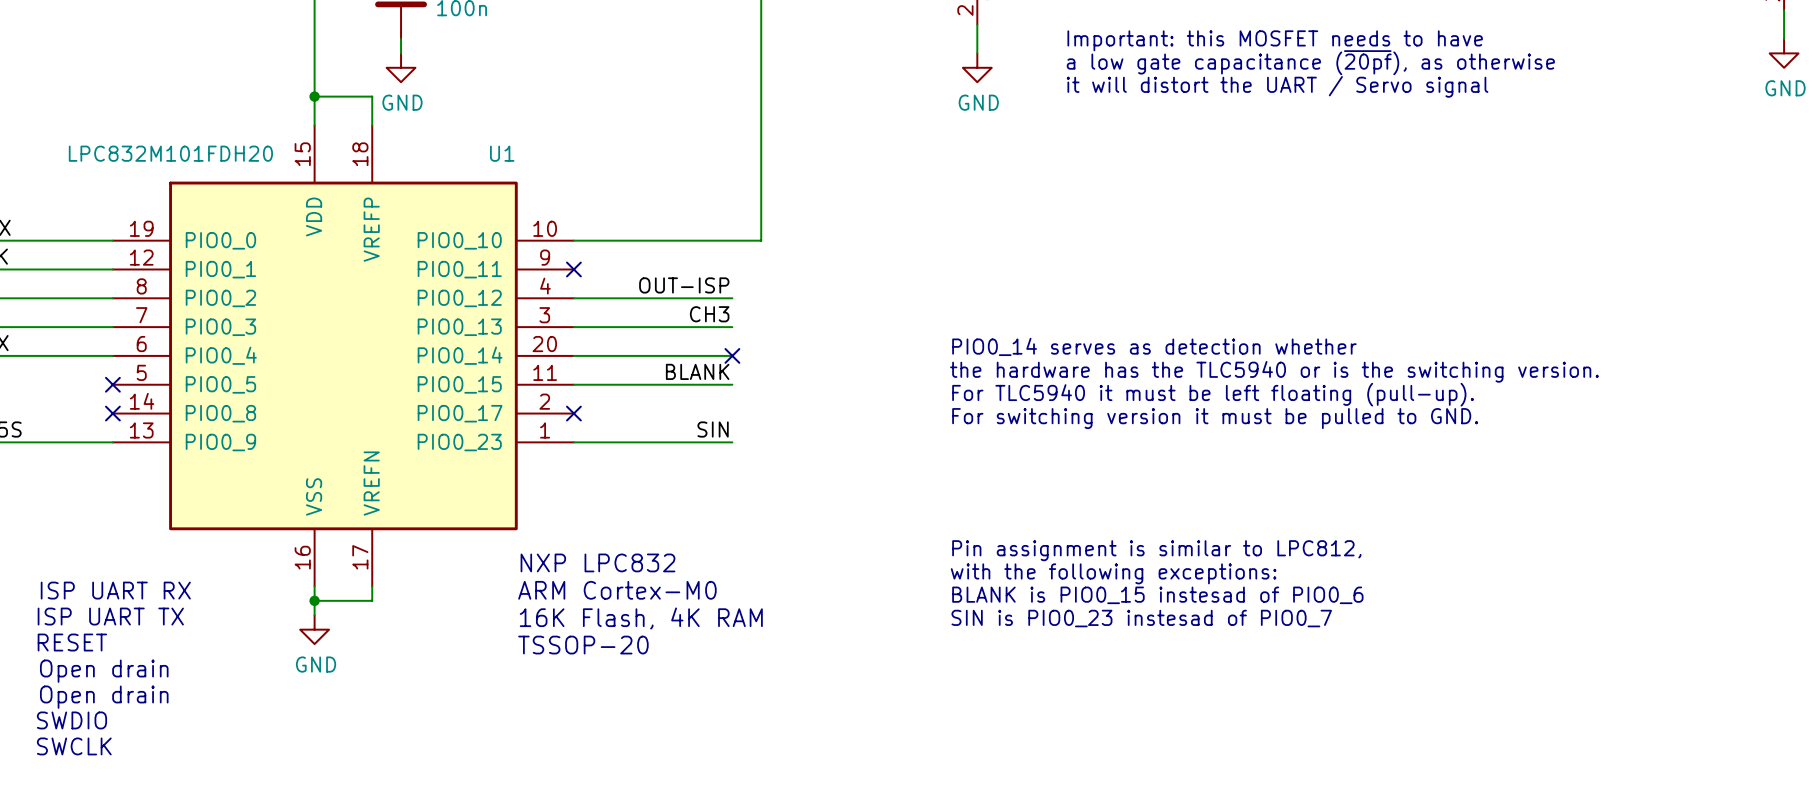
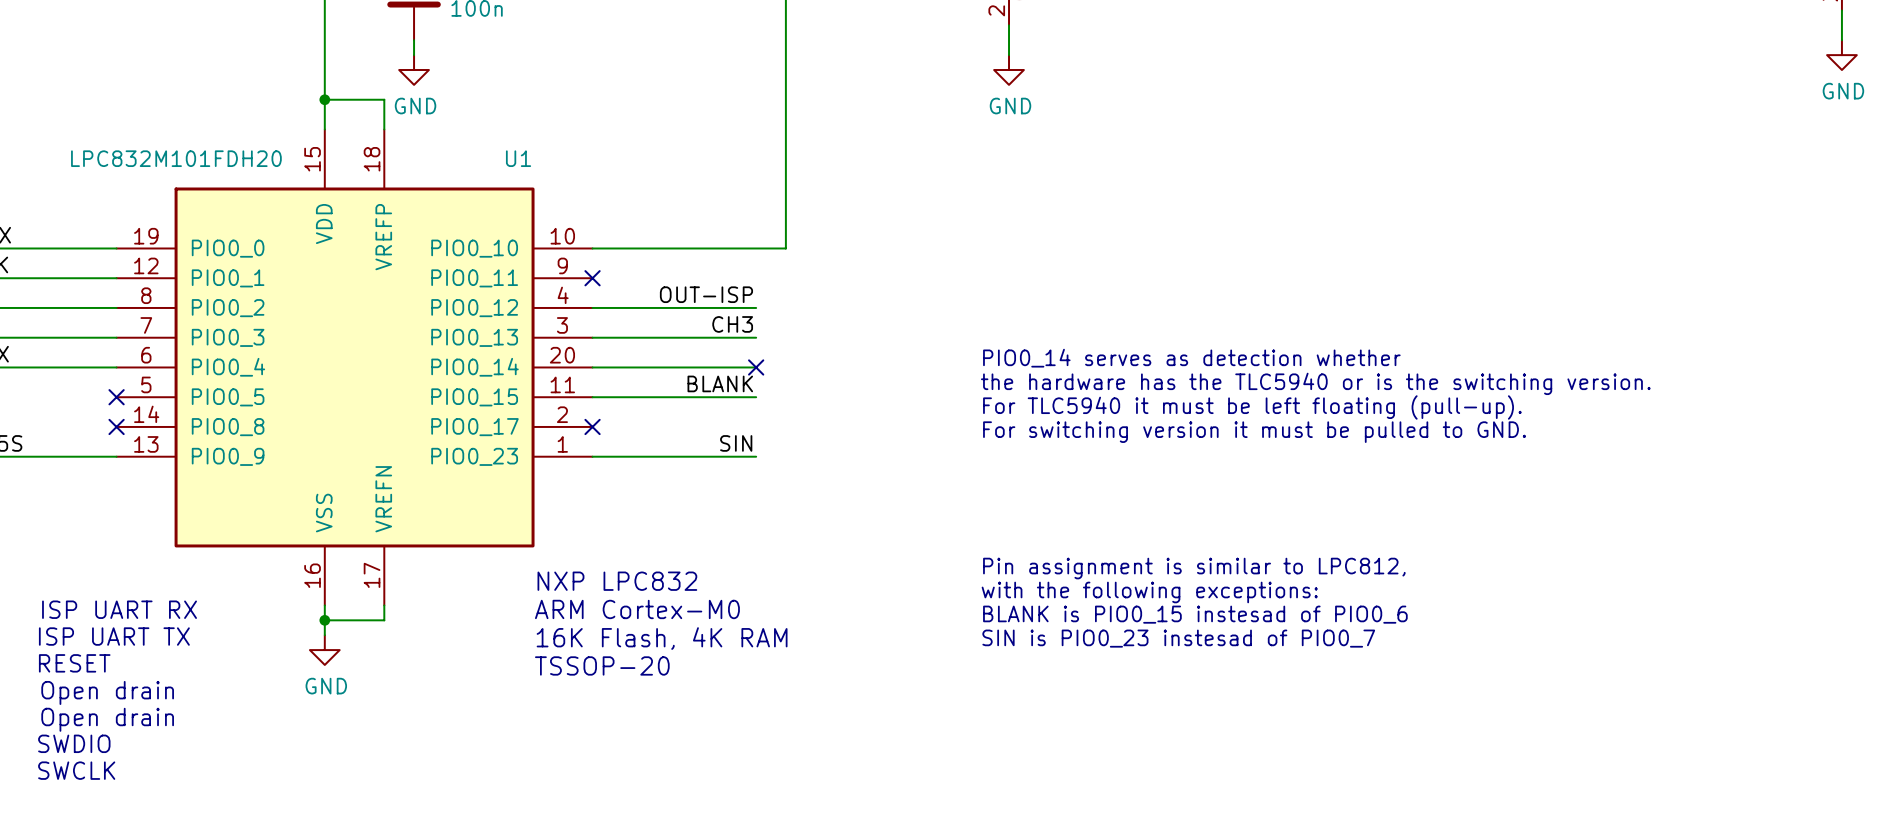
text: Important: this MOSFET needs to have (1275, 40) -> none
text: a low gate capacitance (~{20pf}), as otherwise (1310, 62) -> none
text: it will distort the UART / Servo signal (1277, 86) -> none

